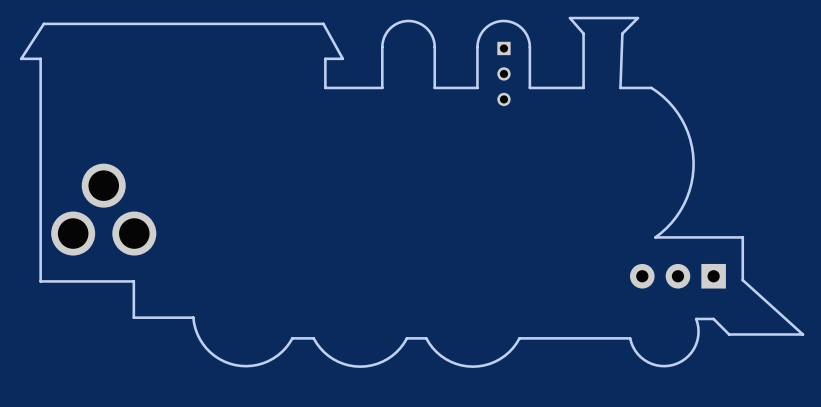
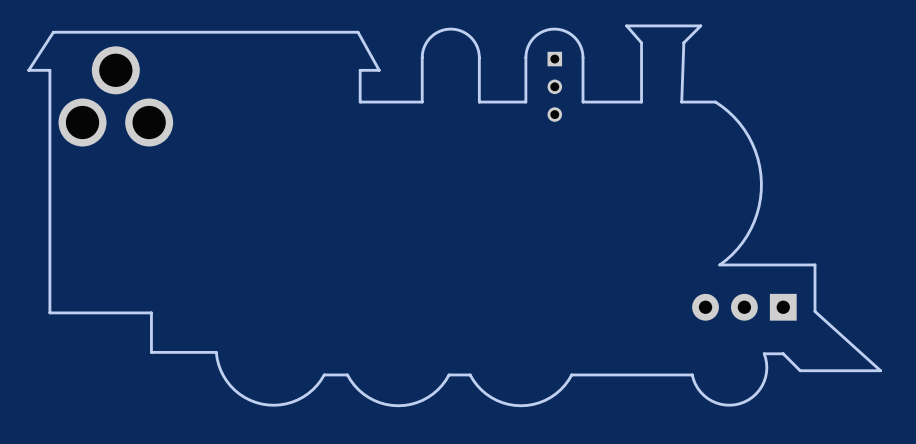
part position: (103, 209) -> (115, 96)

